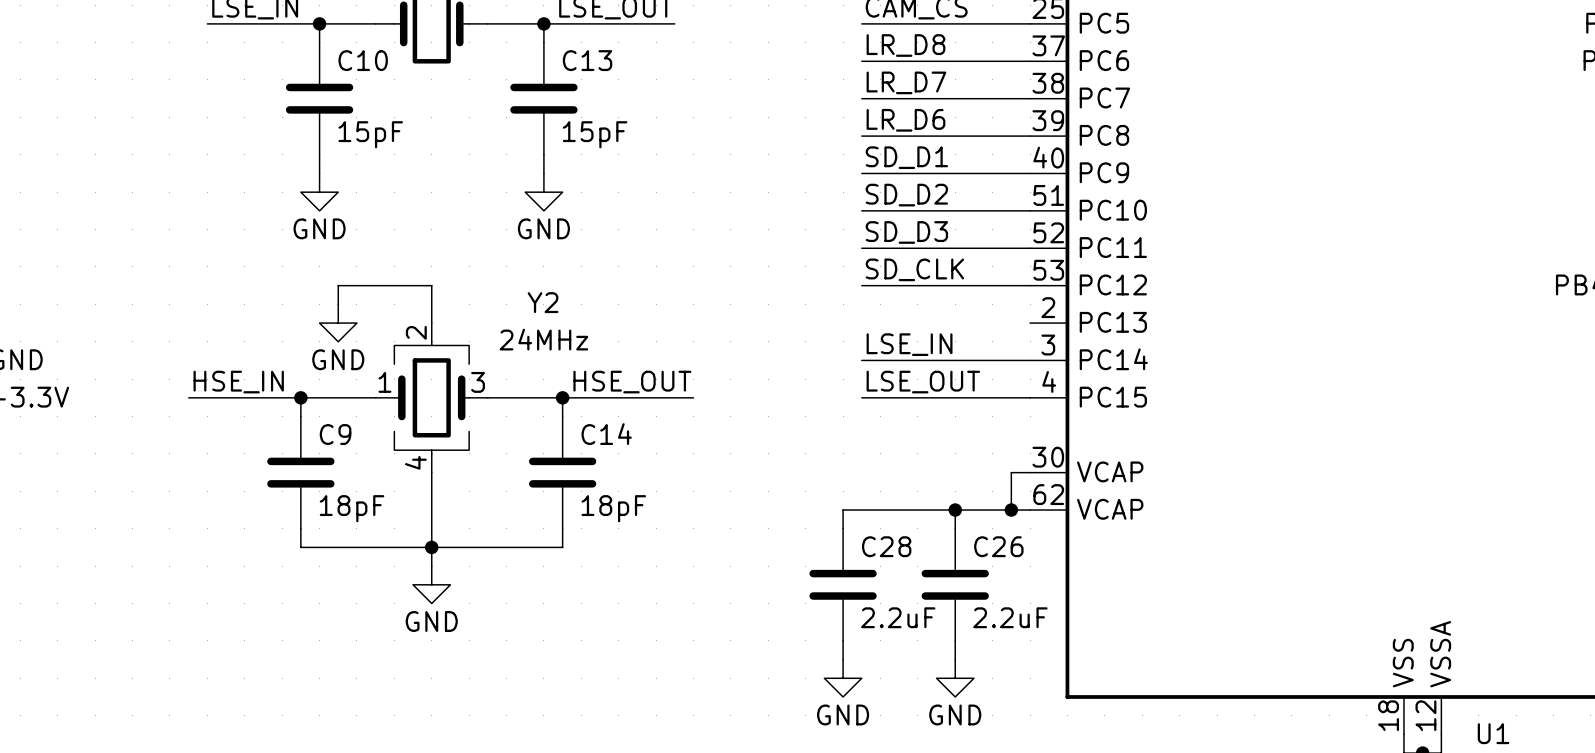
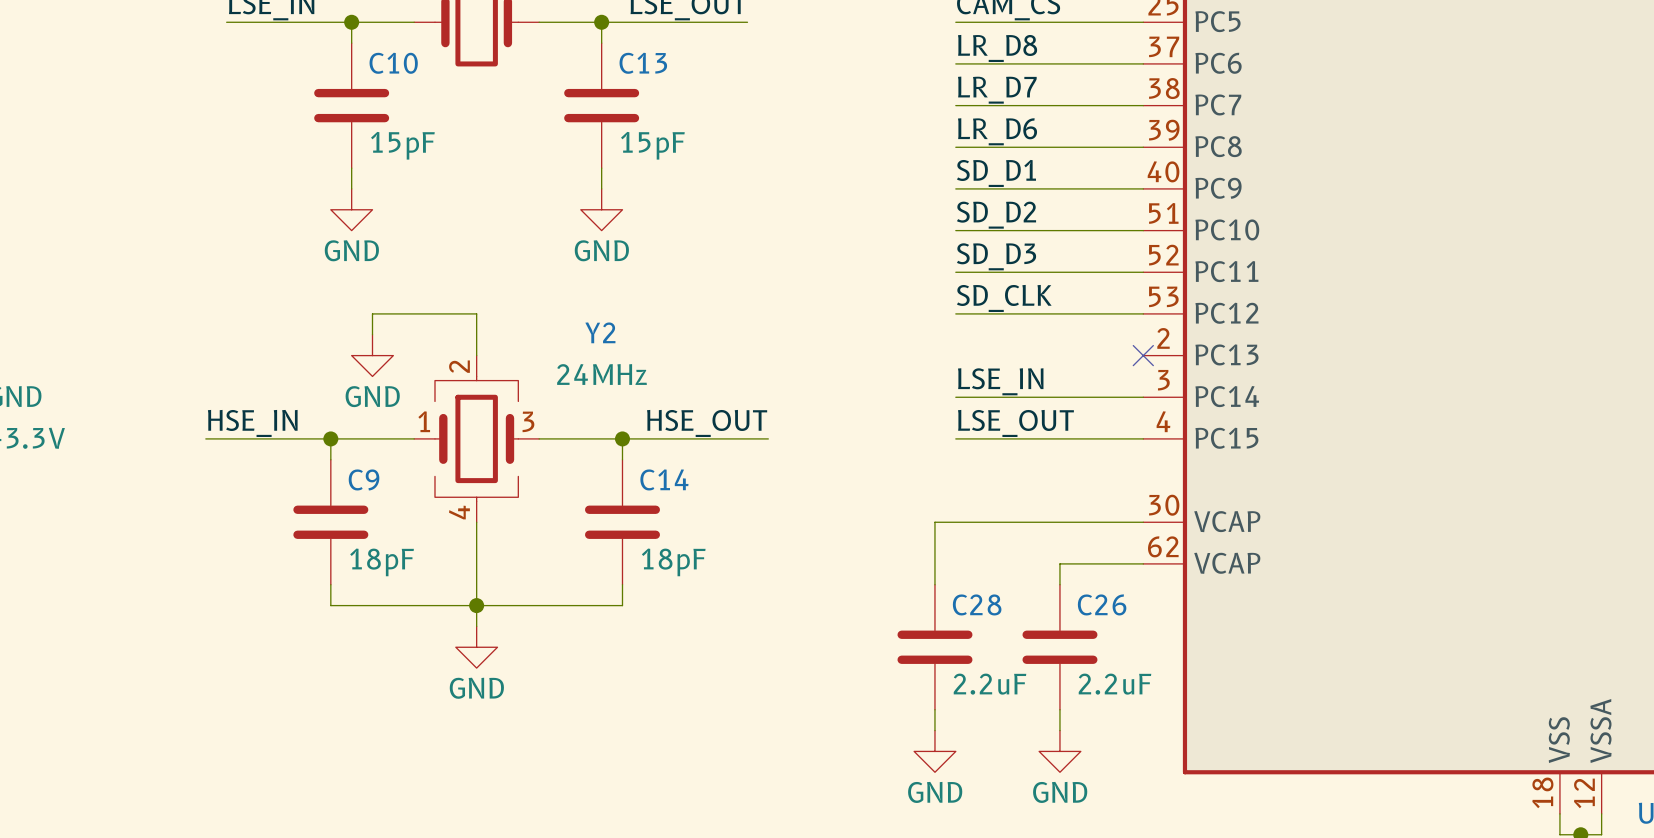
no-connect mark: none -> (1143, 355)
wire: (1011, 472) (1011, 510) -> none
wire: (843, 510) (955, 510) -> (934, 563) (934, 522) (1122, 522)
junction: (955, 510) -> none
junction: (1011, 510) -> none

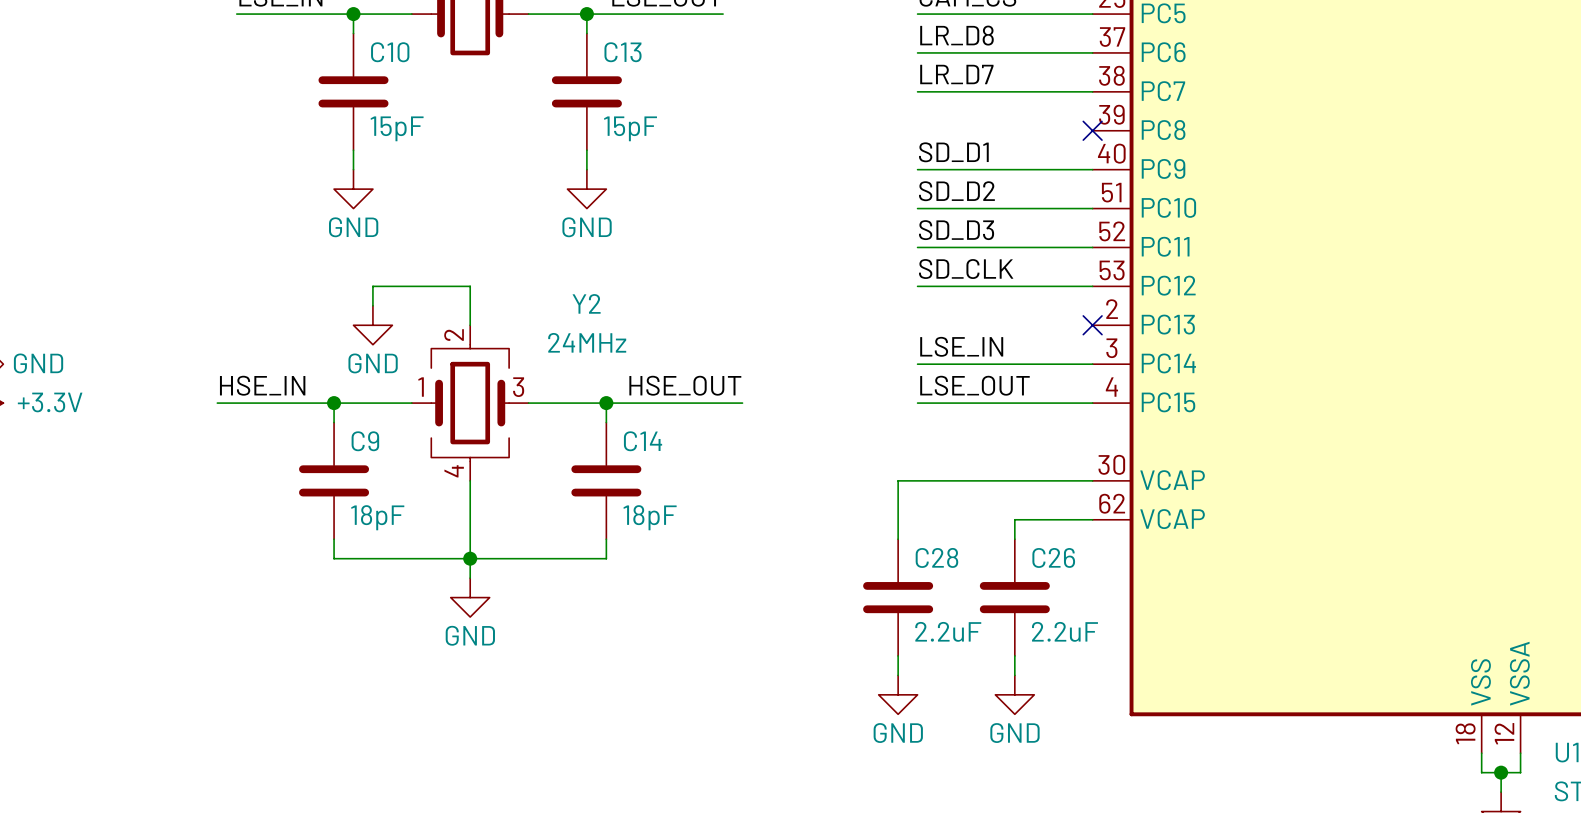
label: LR_D6 (997, 131) -> none
wire: (955, 147) (1143, 147) -> none
no-connect mark: none -> (1092, 130)

